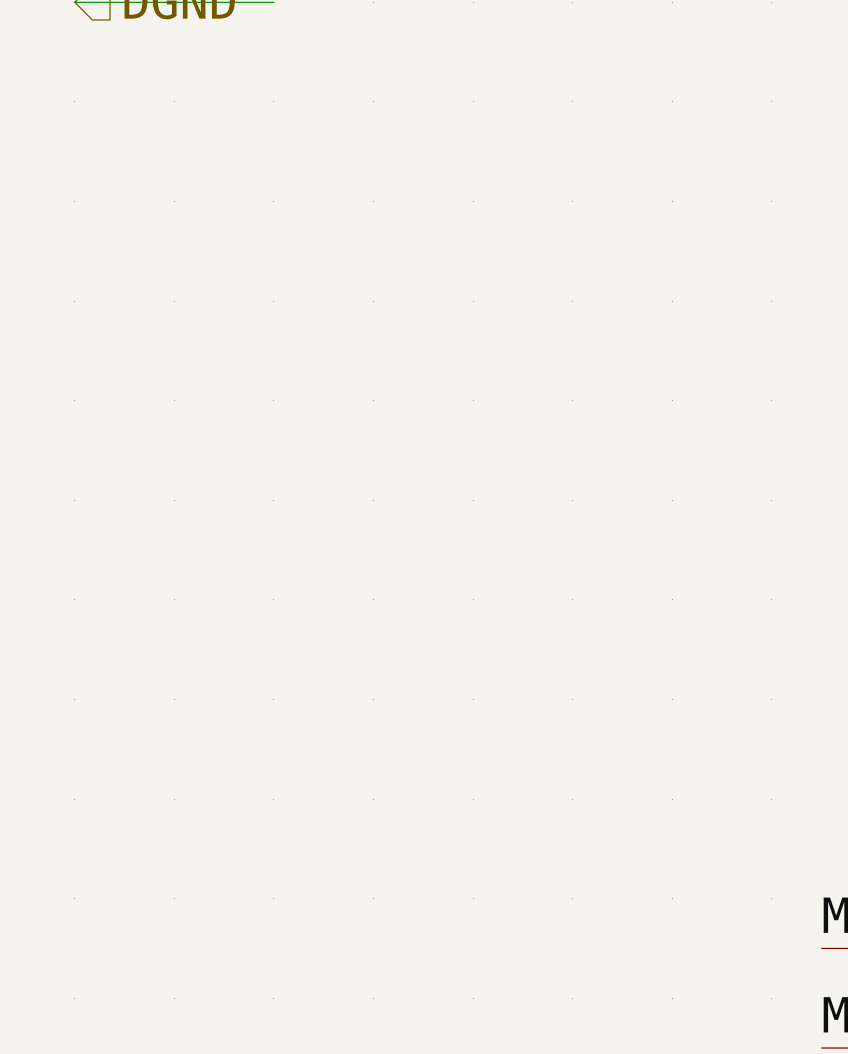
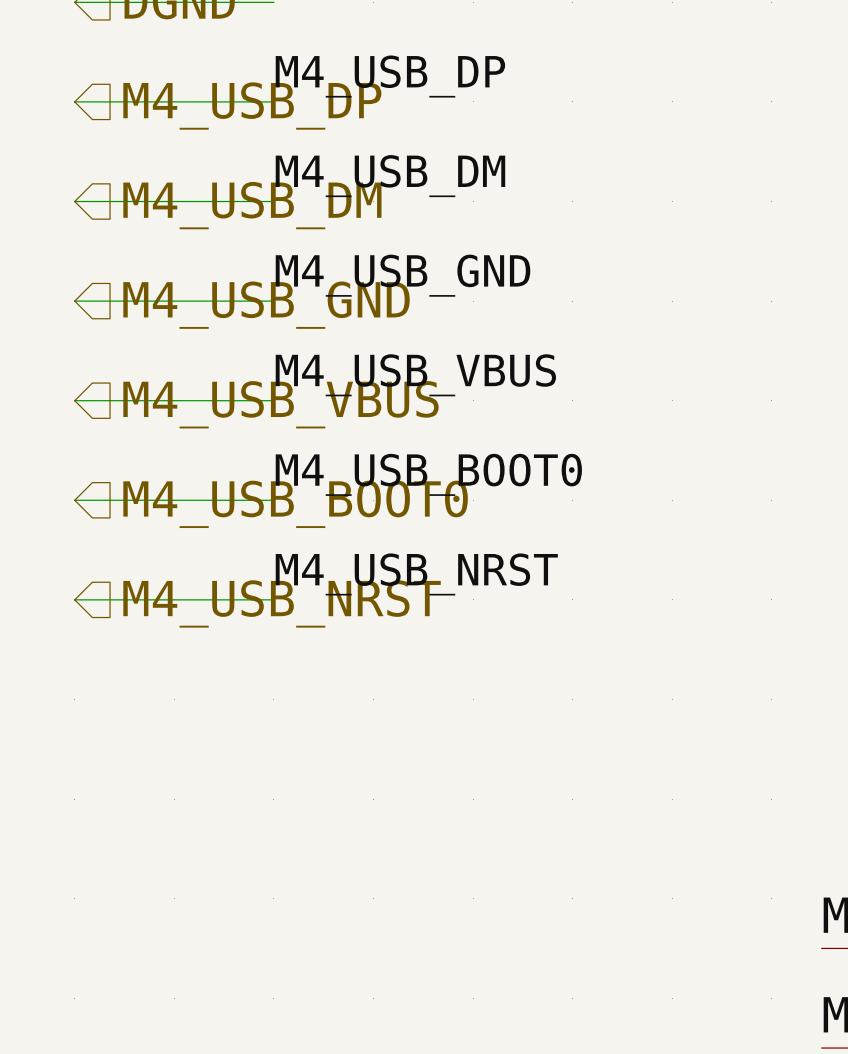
label: none -> M4_USB_DP (390, 76)
wire: none -> (74, 101) (273, 101)
hierarchical label: none -> M4_USB_DP (252, 105)
label: none -> M4_USB_DM (390, 176)
wire: none -> (74, 201) (273, 201)
hierarchical label: none -> M4_USB_DM (252, 205)
label: none -> M4_USB_GND (403, 275)
wire: none -> (74, 301) (273, 301)
hierarchical label: none -> M4_USB_GND (266, 305)
label: none -> M4_USB_VBUS (415, 375)
wire: none -> (74, 400) (273, 400)
hierarchical label: none -> M4_USB_VBUS (280, 404)
label: none -> M4_USB_BOOT0 (428, 474)
wire: none -> (74, 500) (273, 500)
hierarchical label: none -> M4_USB_BOOT0 (295, 504)
label: none -> M4_USB_NRST (416, 574)
wire: none -> (74, 599) (273, 599)
hierarchical label: none -> M4_USB_NRST (282, 603)

